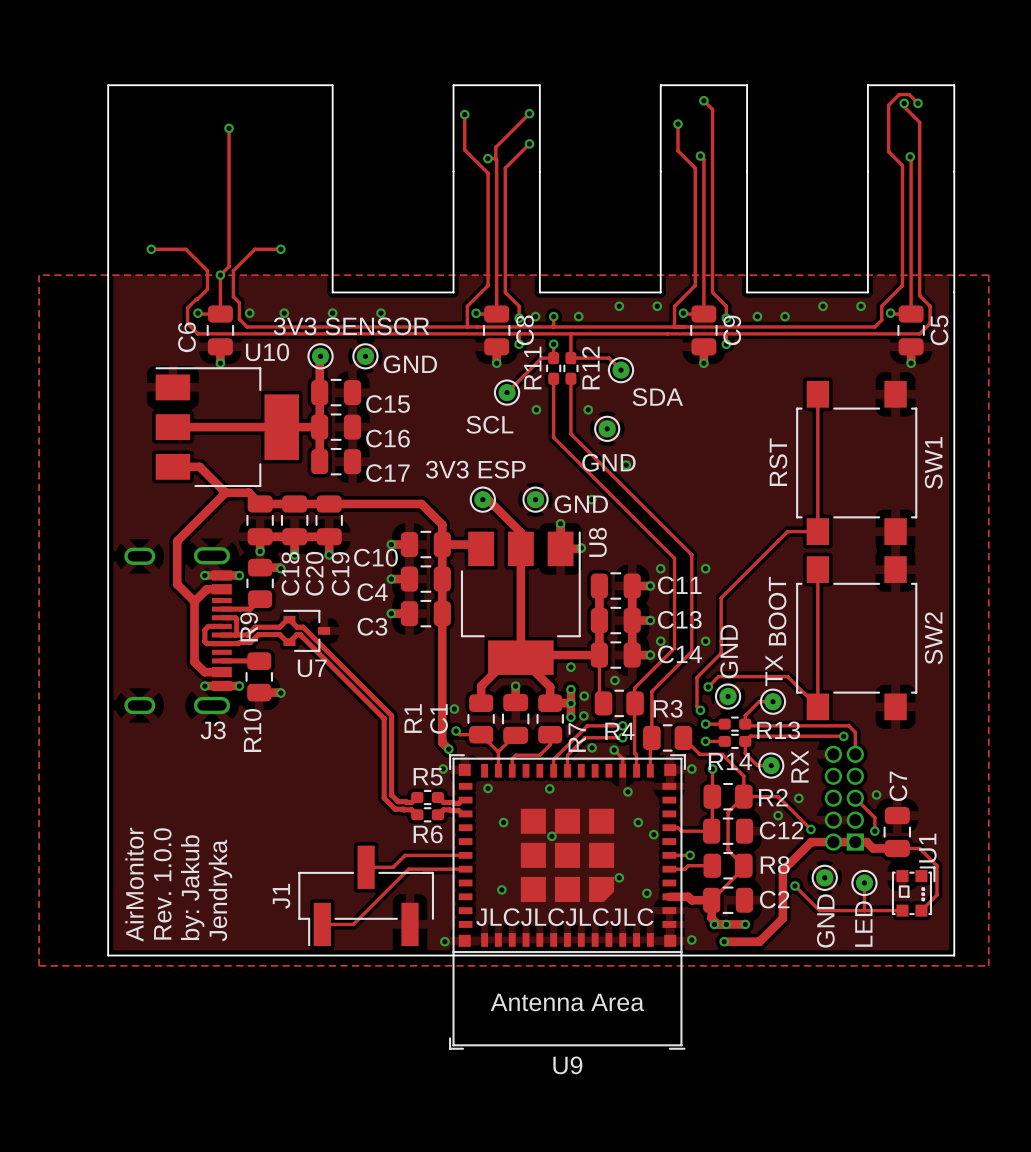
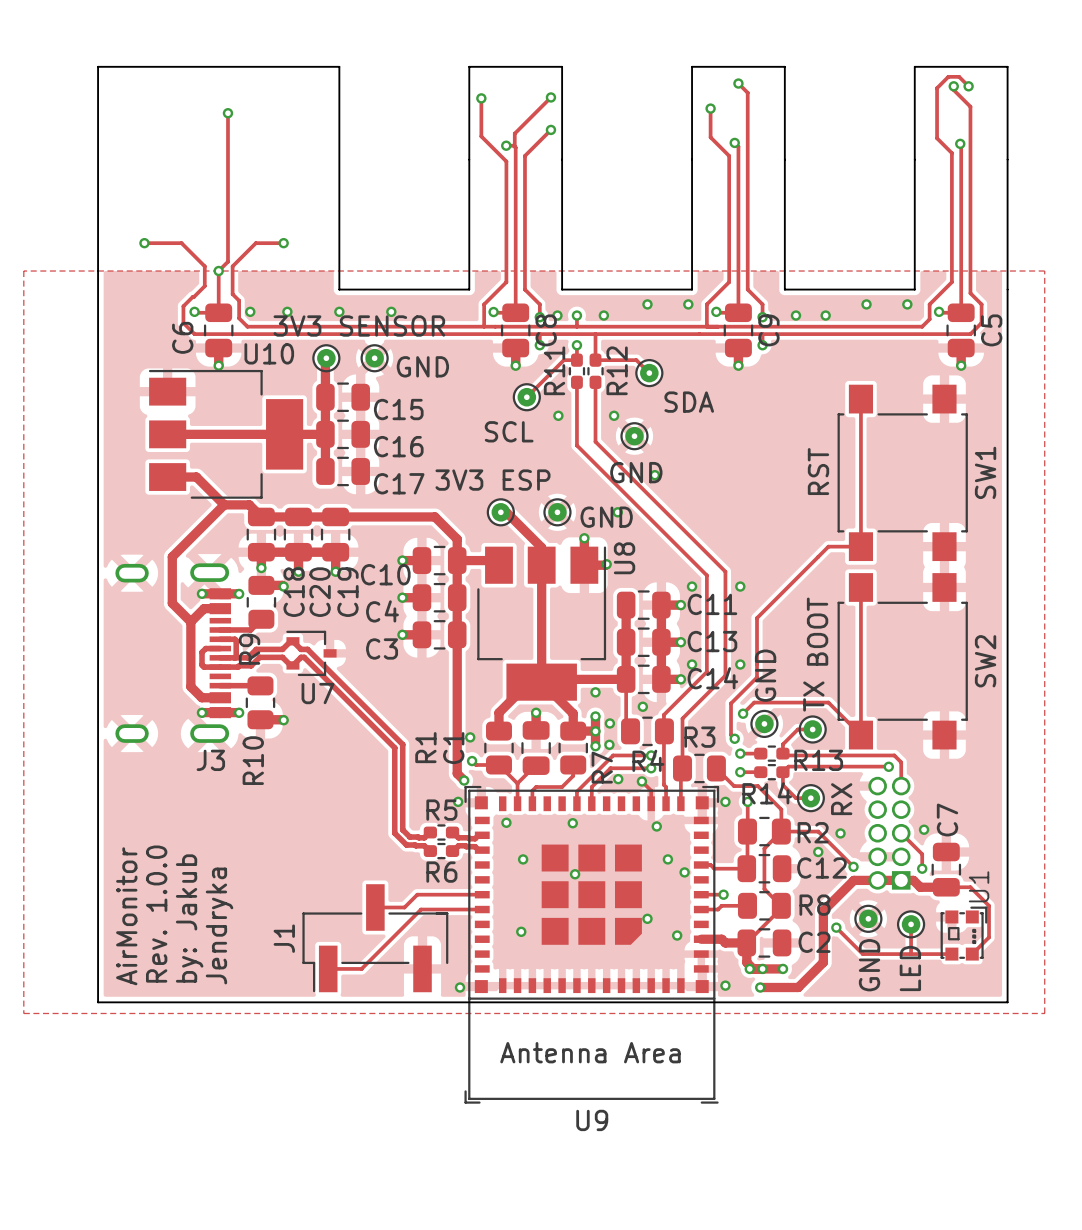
text: JLCJLCJLCJLC (564, 917) -> none

